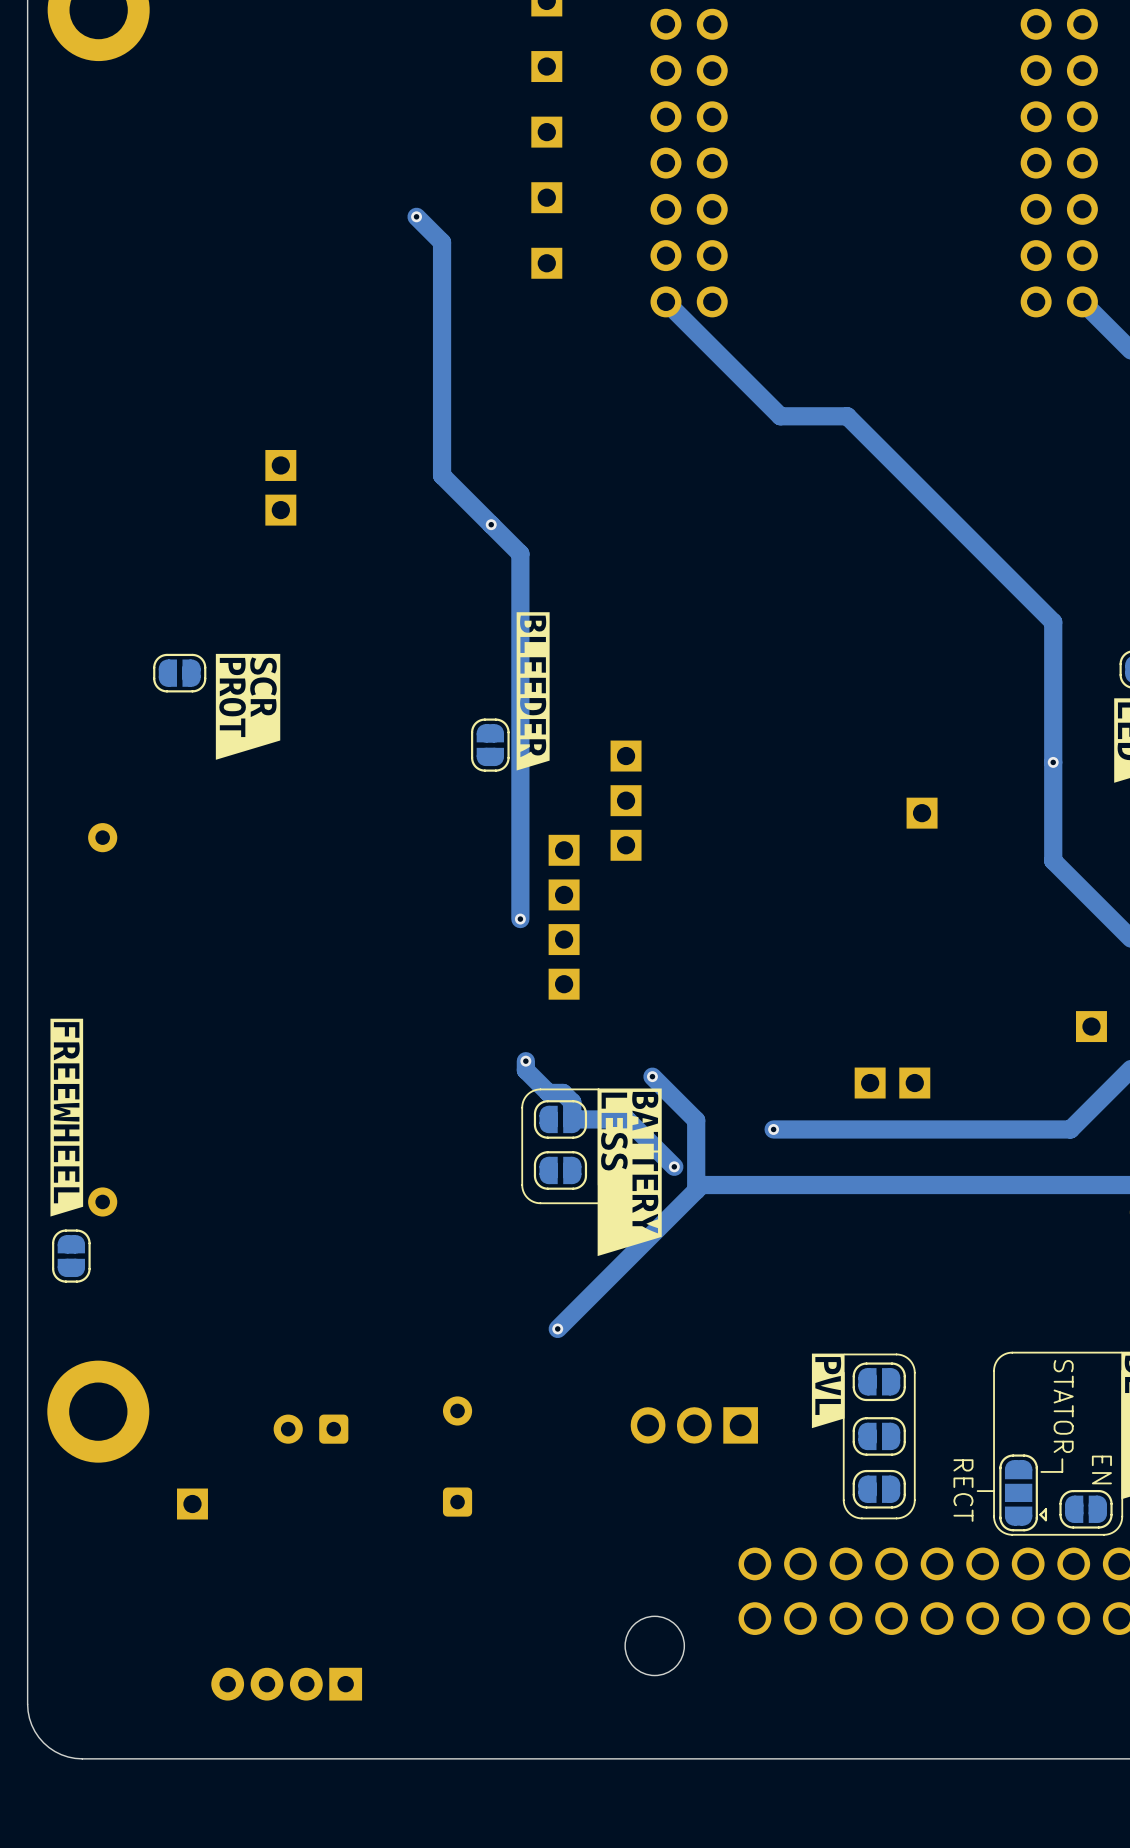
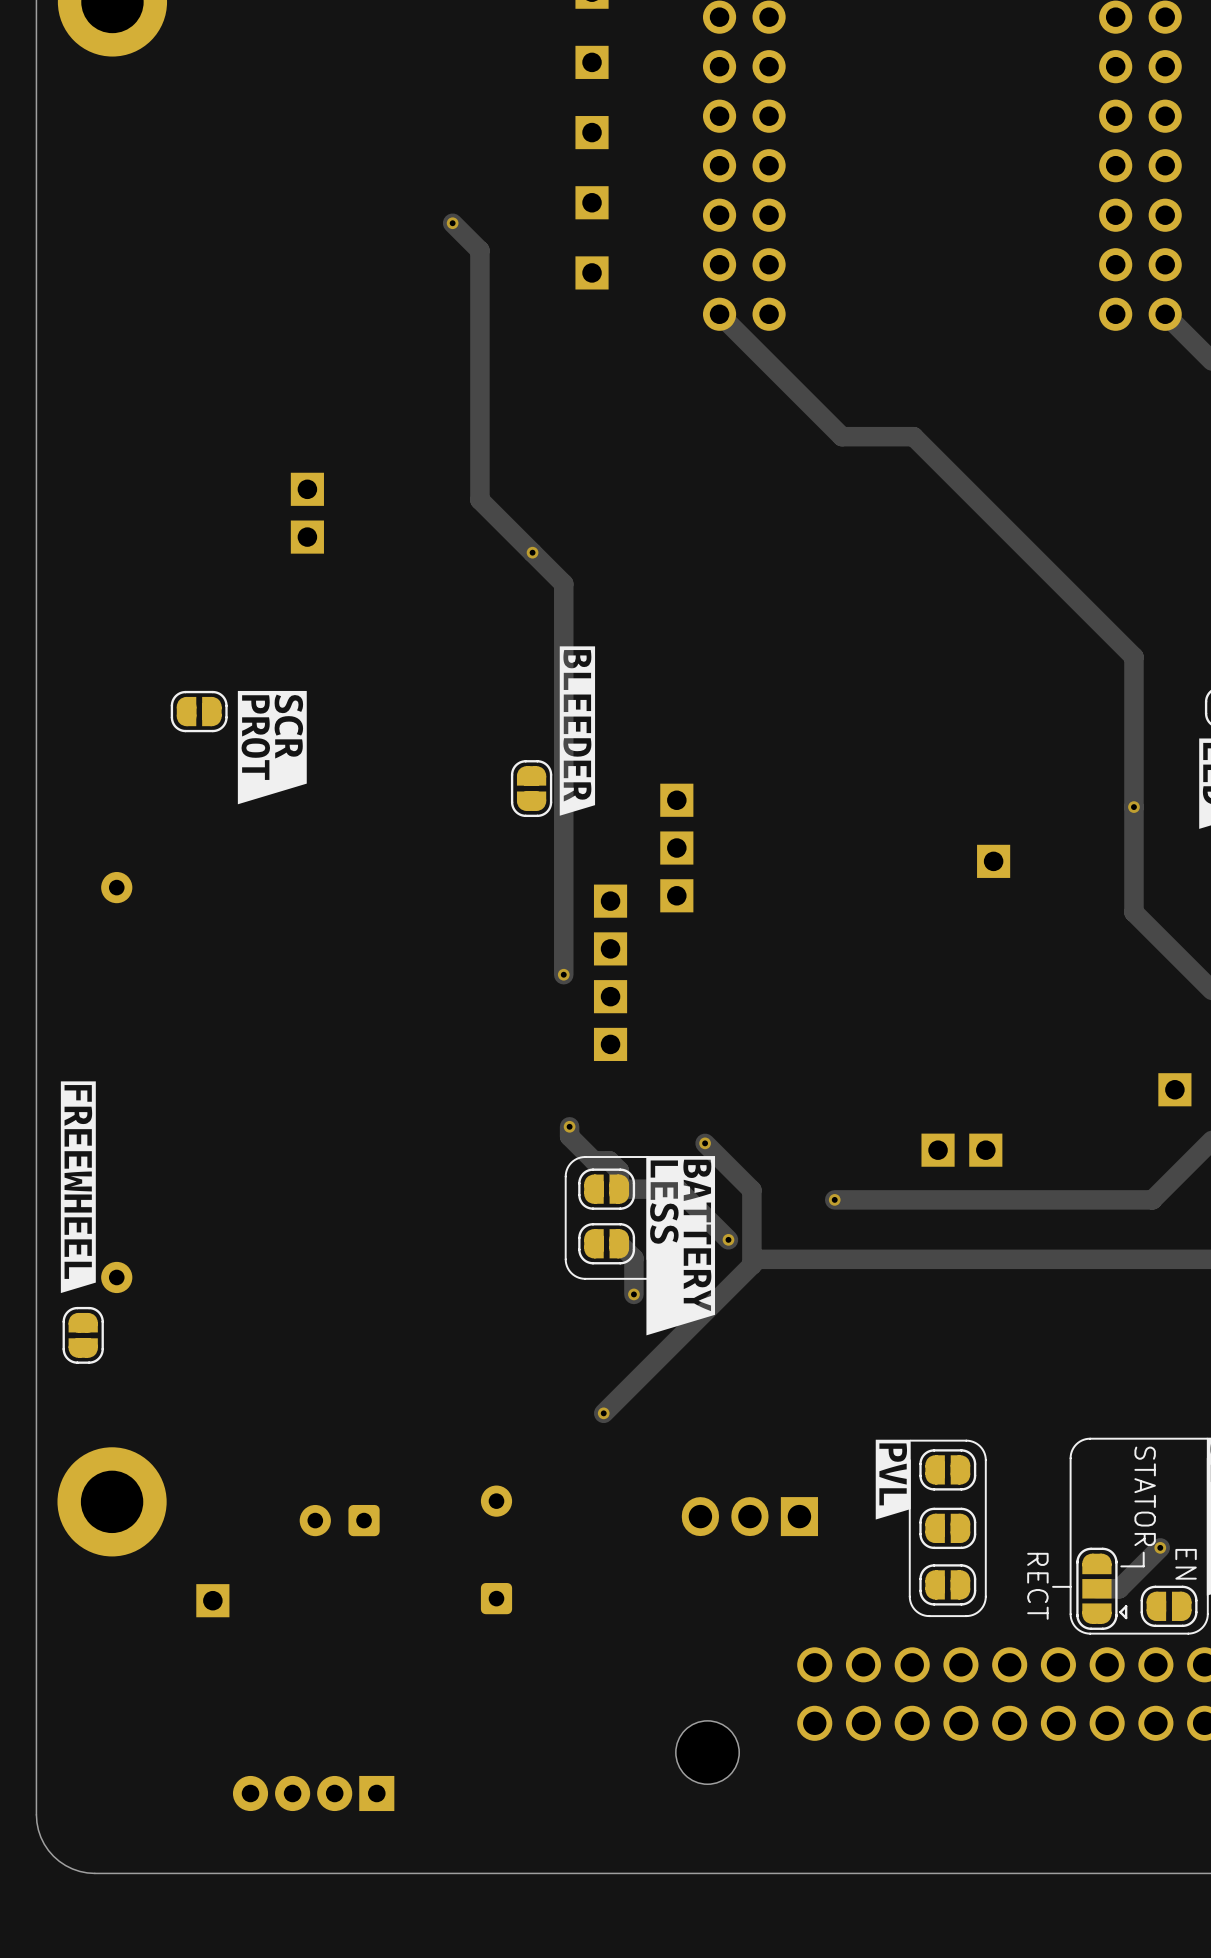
track: none -> (619, 1243) (633, 1258) (633, 1294)
via: none -> (633, 1294)
track: none -> (1160, 1547) (1119, 1588) (1096, 1588)
via: none -> (1160, 1547)

